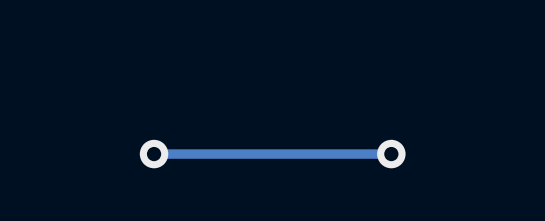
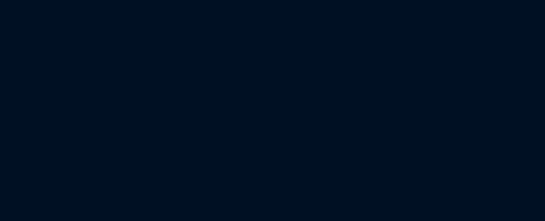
via: (154, 154) -> none
track: (391, 154) (154, 154) -> none
via: (391, 154) -> none

